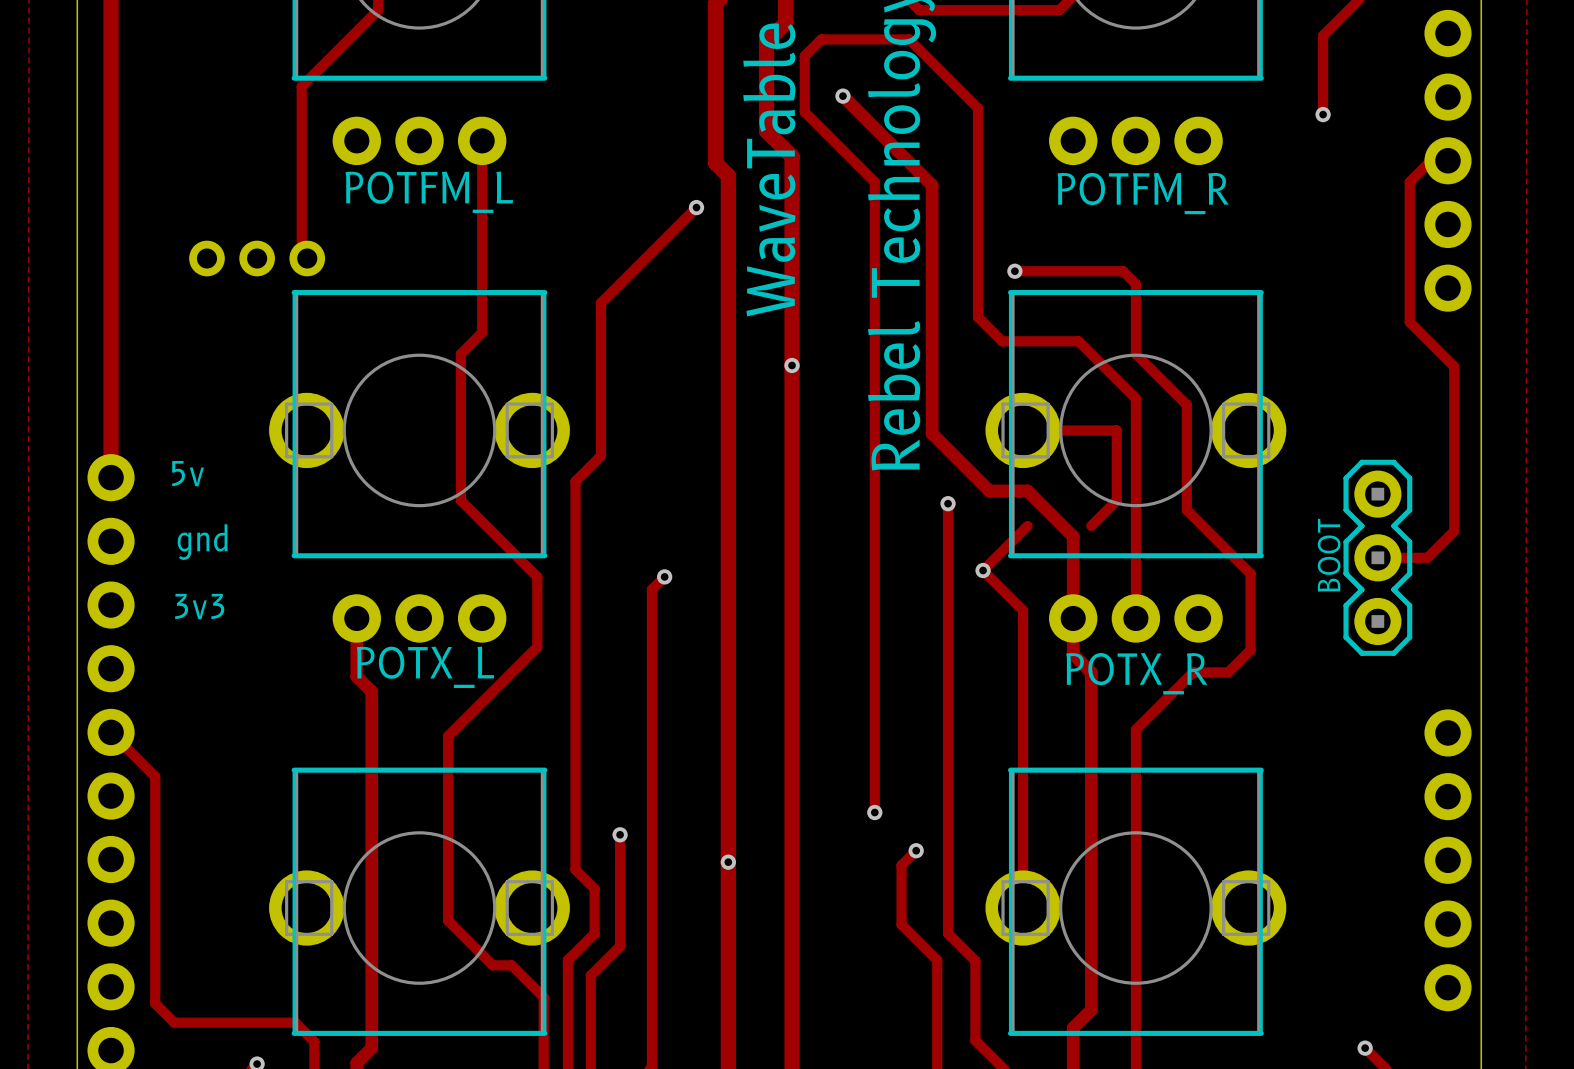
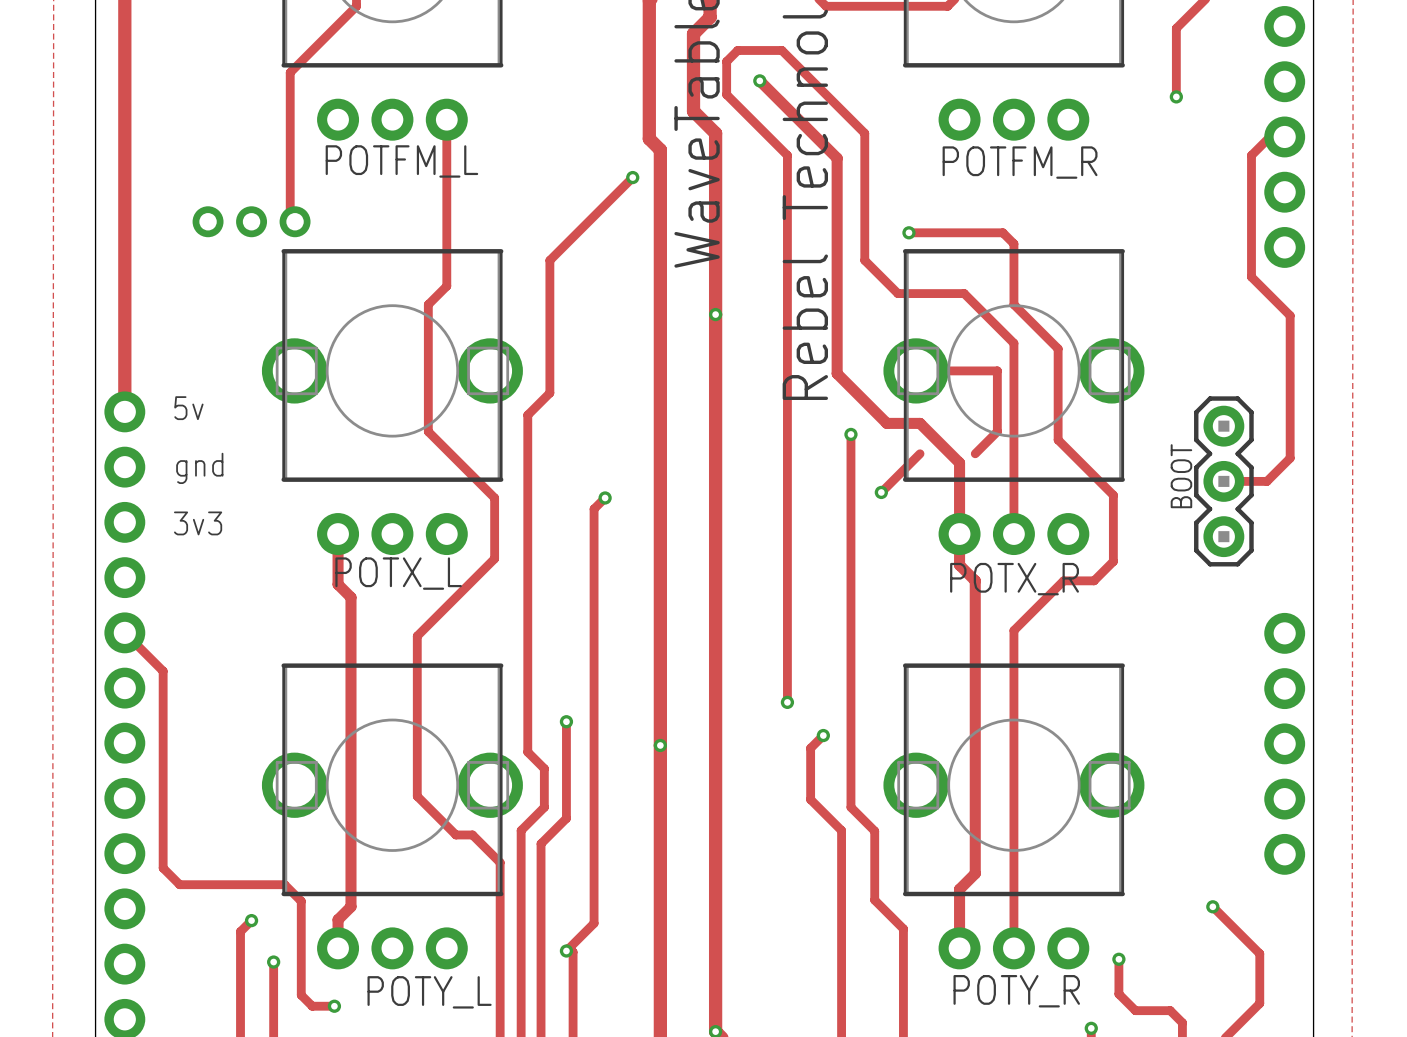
track: (804, 73) (804, 56) (821, 39) (909, 39) (977, 108) (977, 317) -> (726, 61) (737, 50) (781, 50) (864, 133) (864, 260) (876, 272)
track: (983, 570) (1023, 610) (1023, 908) -> none

